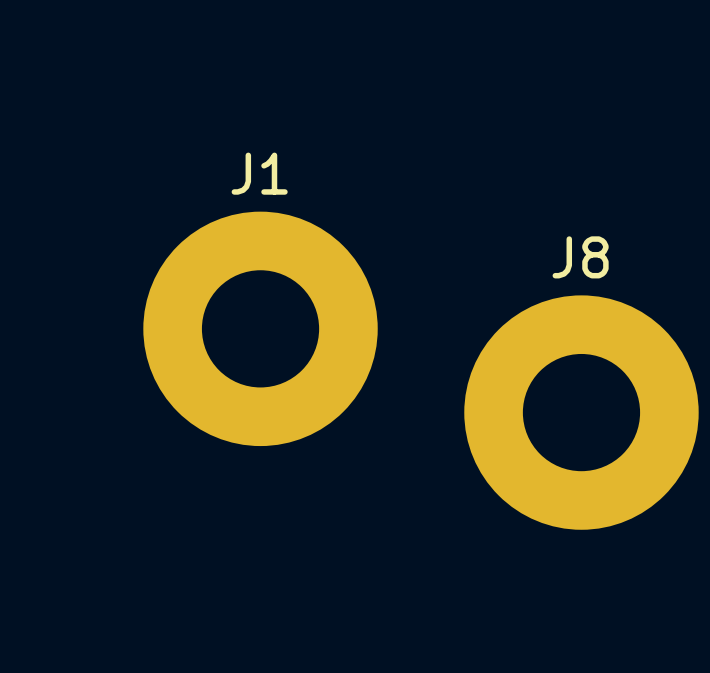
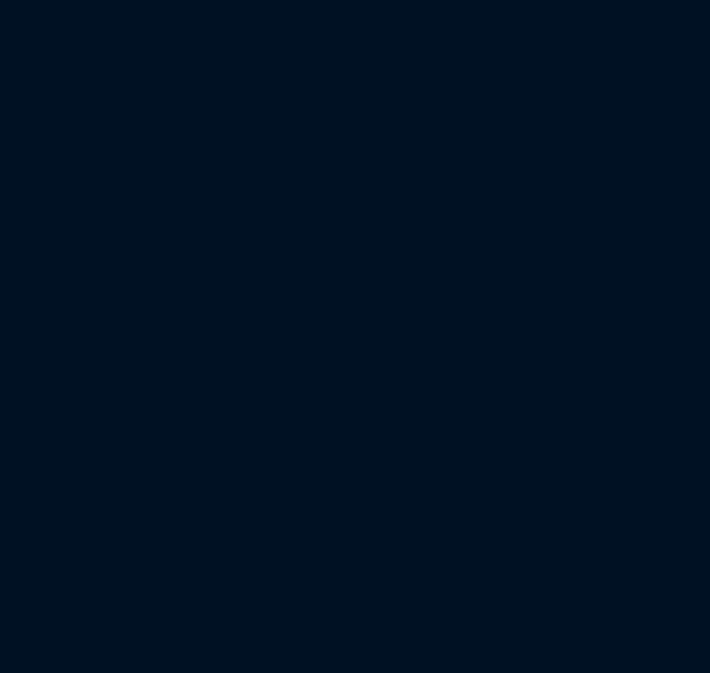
J1: (260, 328) -> none
J8: (581, 412) -> none

